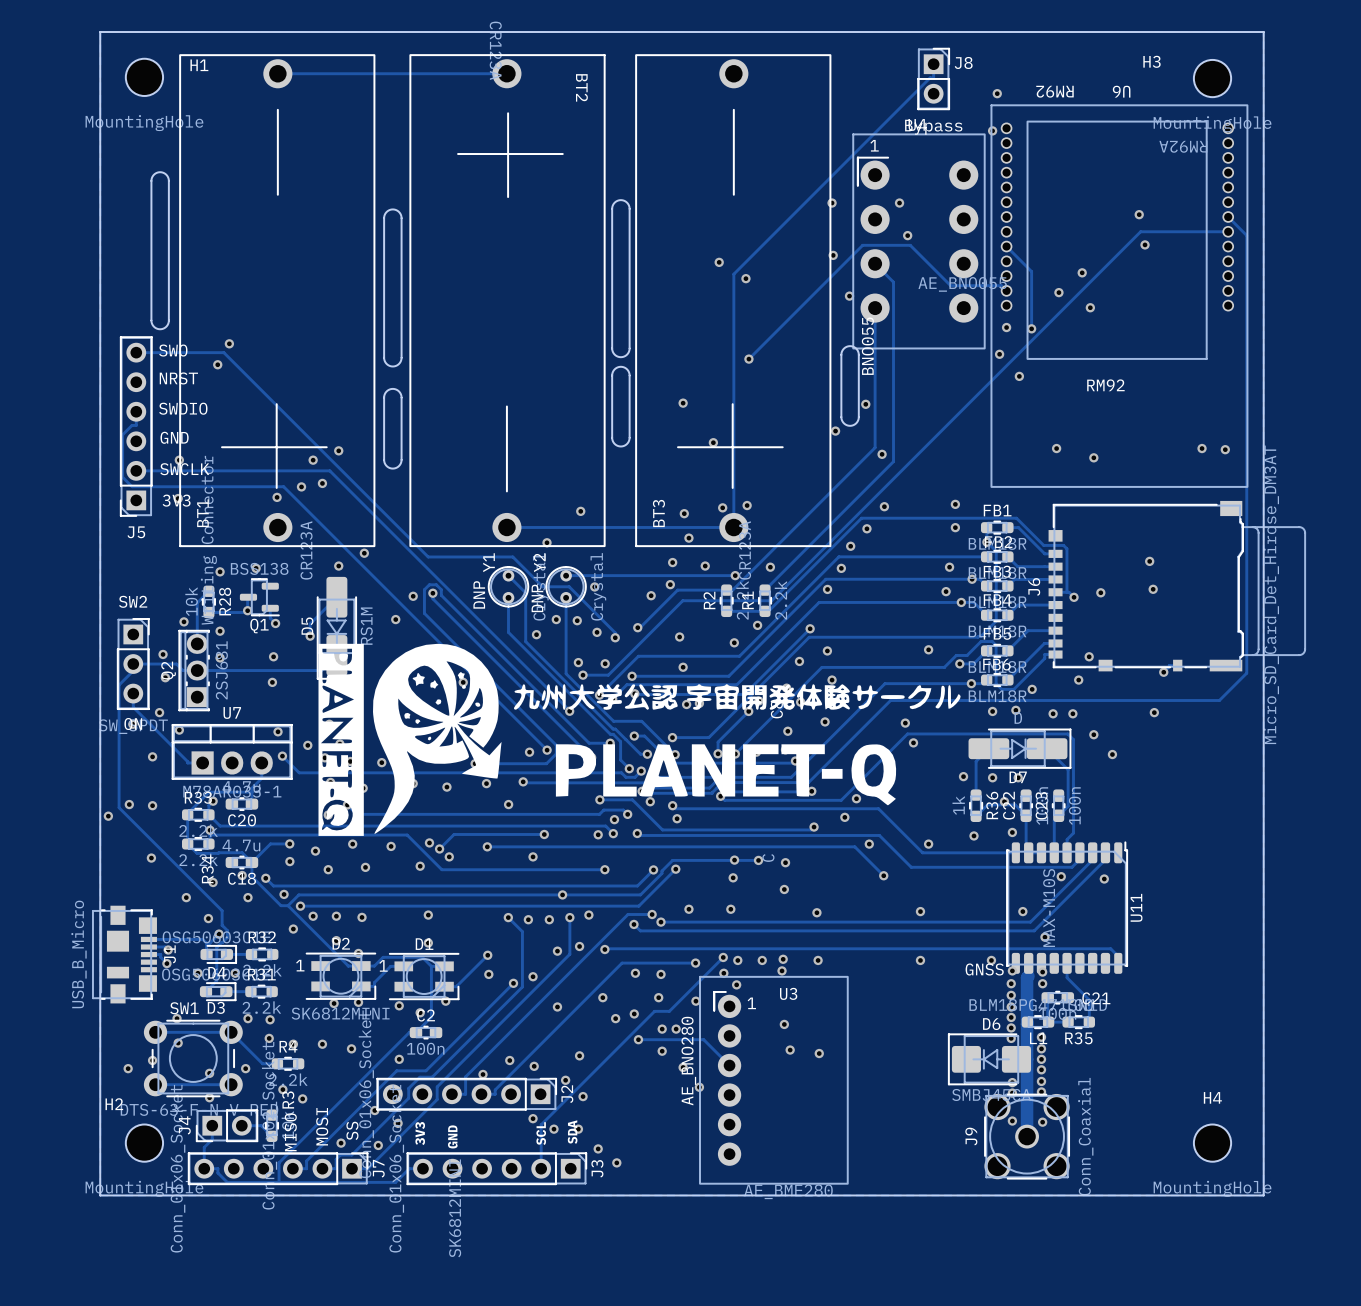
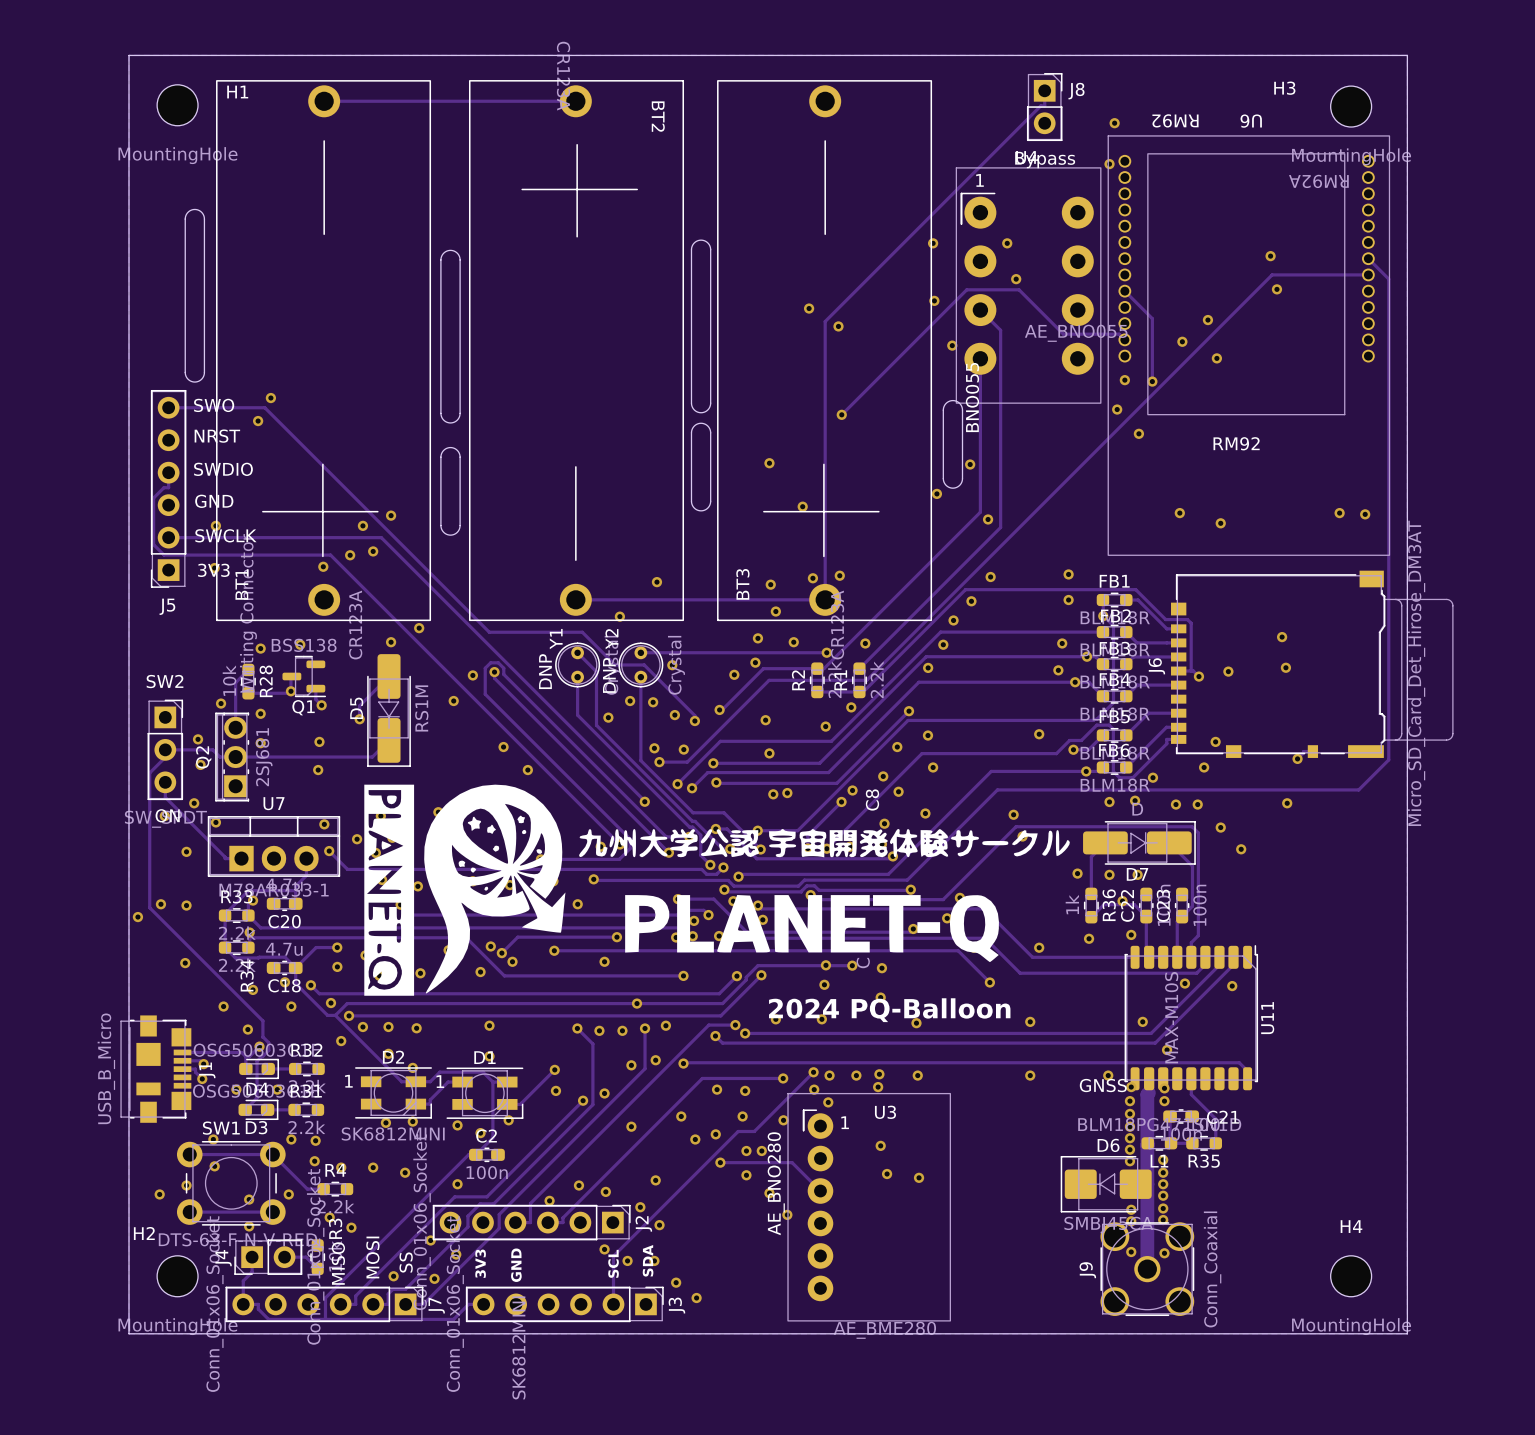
drawing position: (639, 739) -> (717, 890)
text: none -> 2024 PQ-Balloon (889, 1010)

